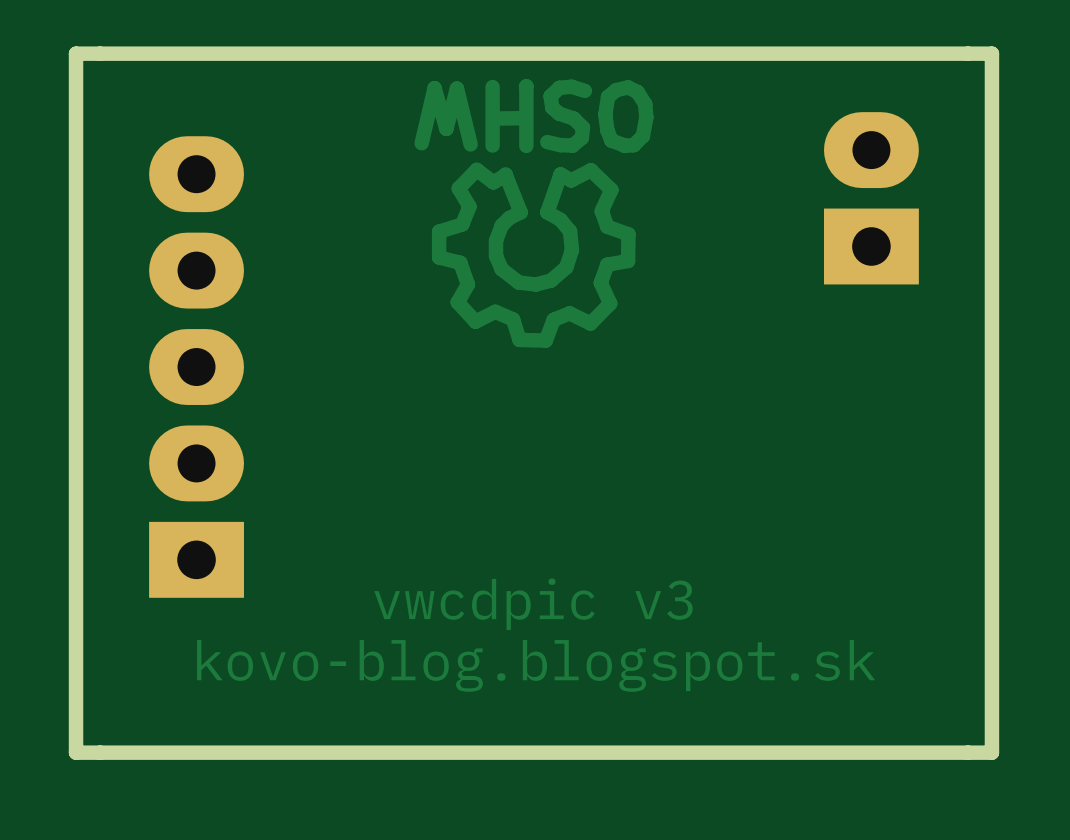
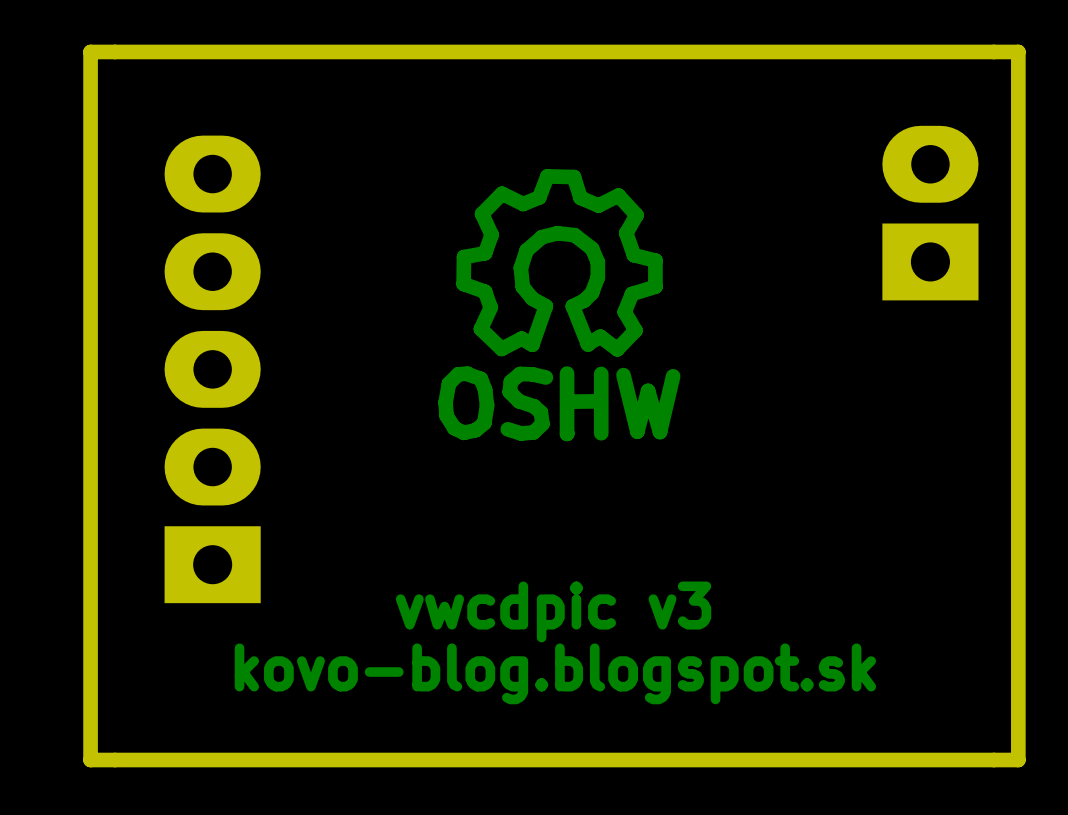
drawing: [414, 79, 654, 348] -> none
drawing: none -> [438, 169, 681, 442]
part position: (871, 198) -> (930, 213)

